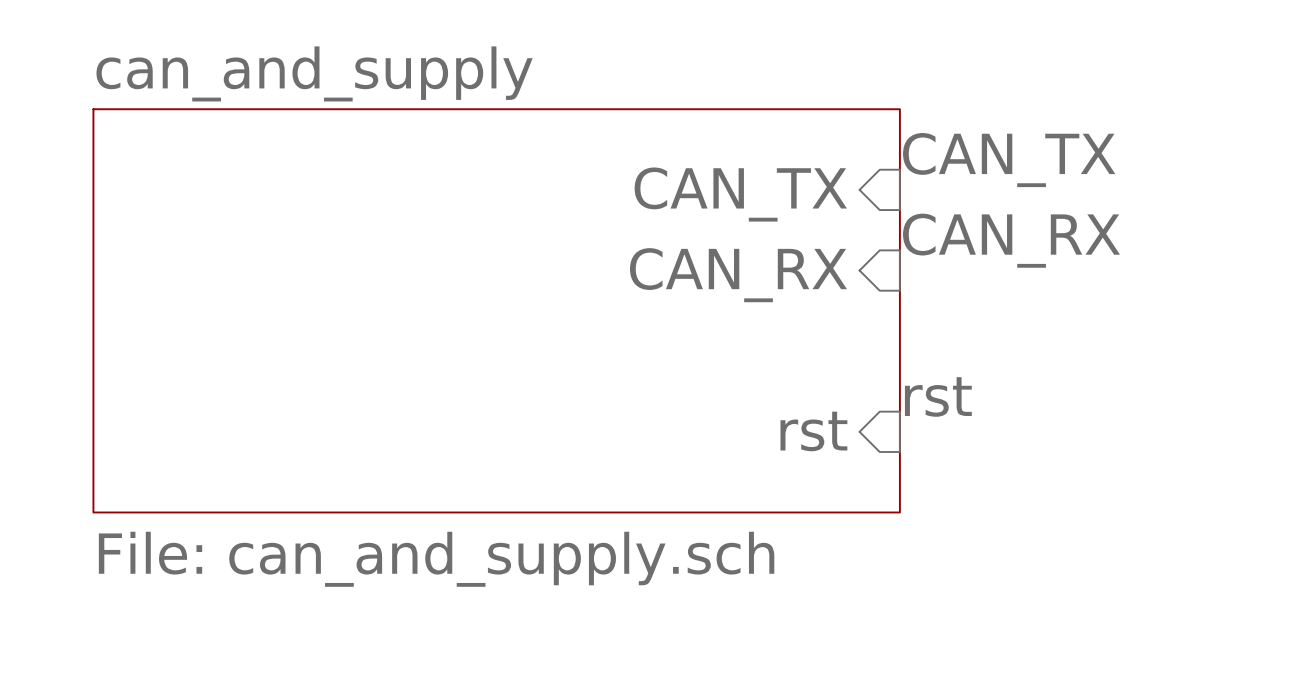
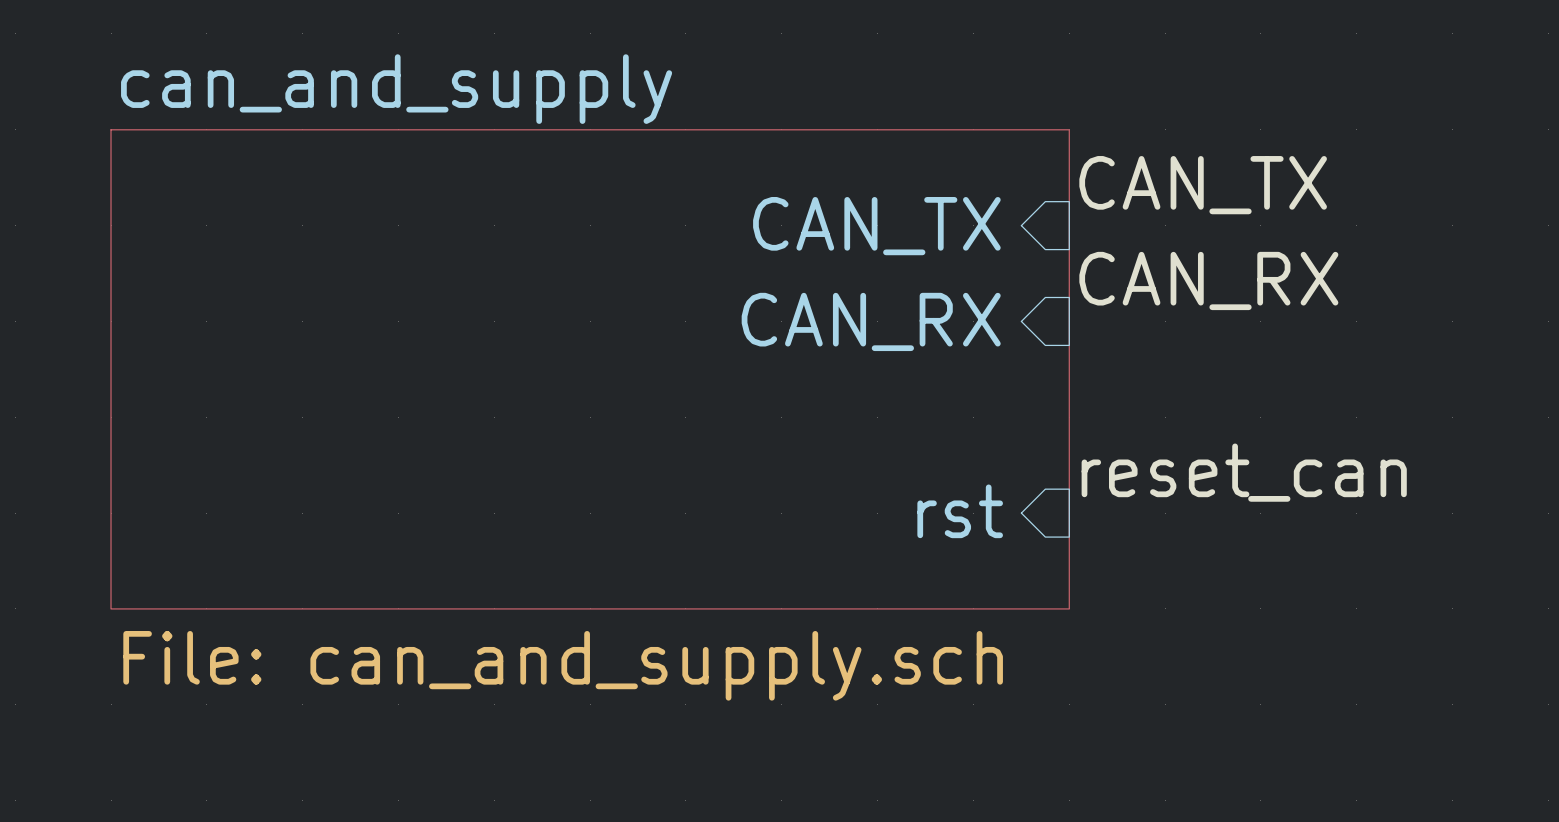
label: rst (938, 396) -> reset_can (1244, 472)

